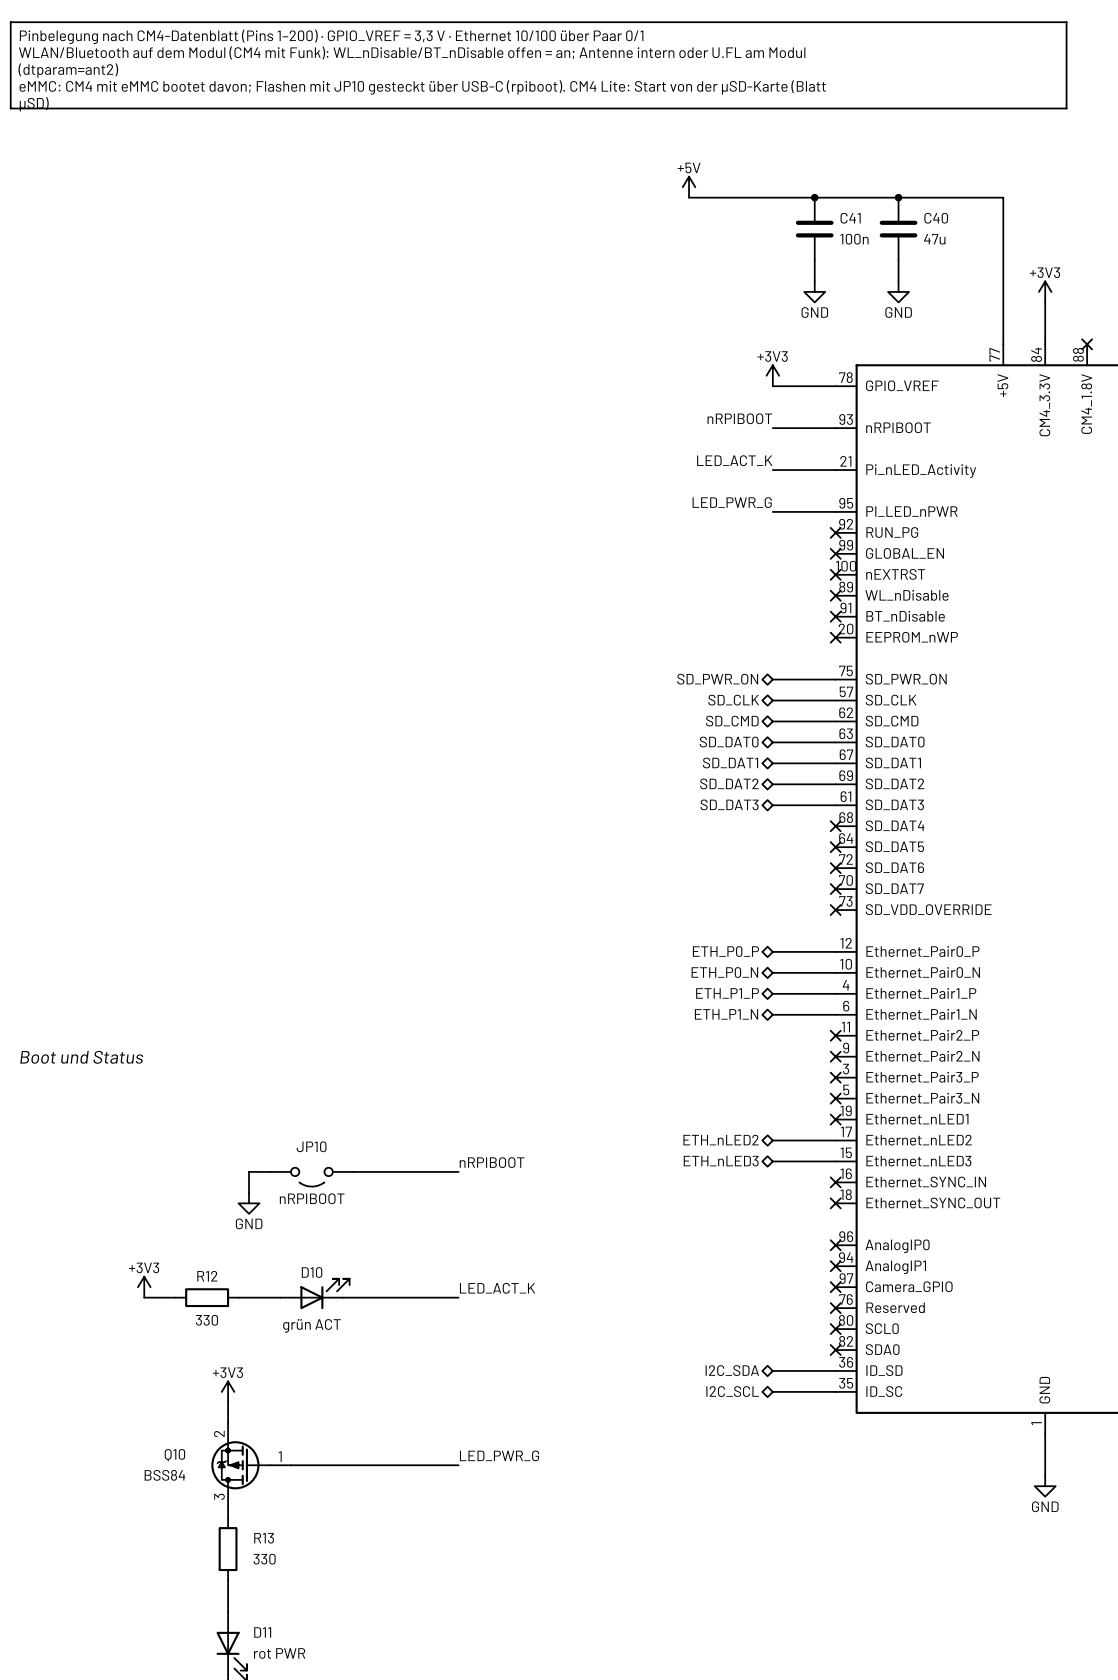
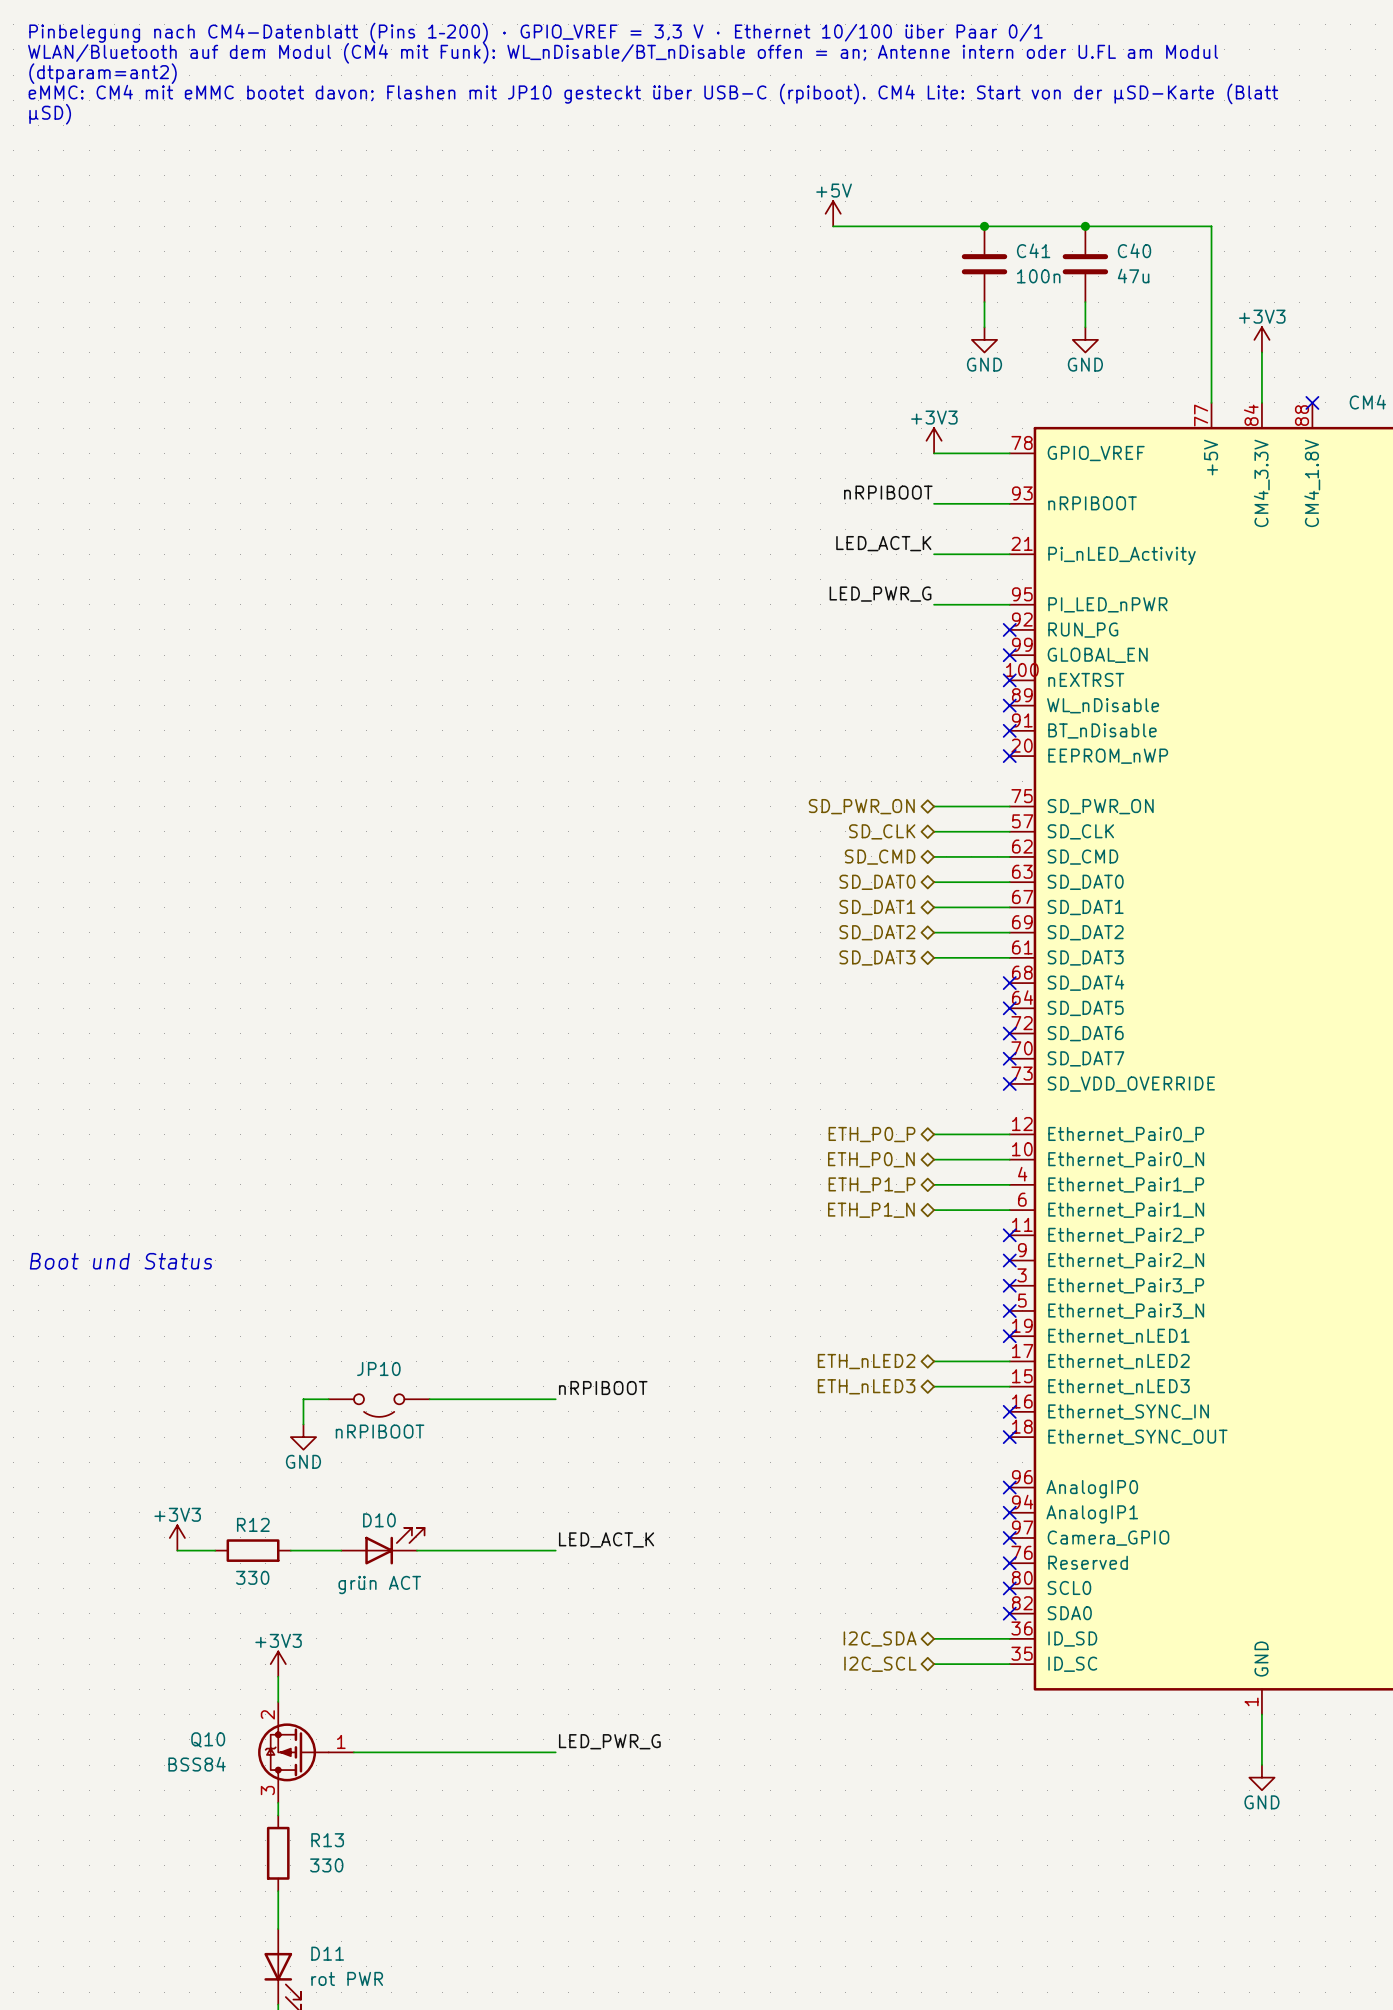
line: (10, 22) (1066, 22) (1066, 108) (10, 108) (10, 22) -> none

